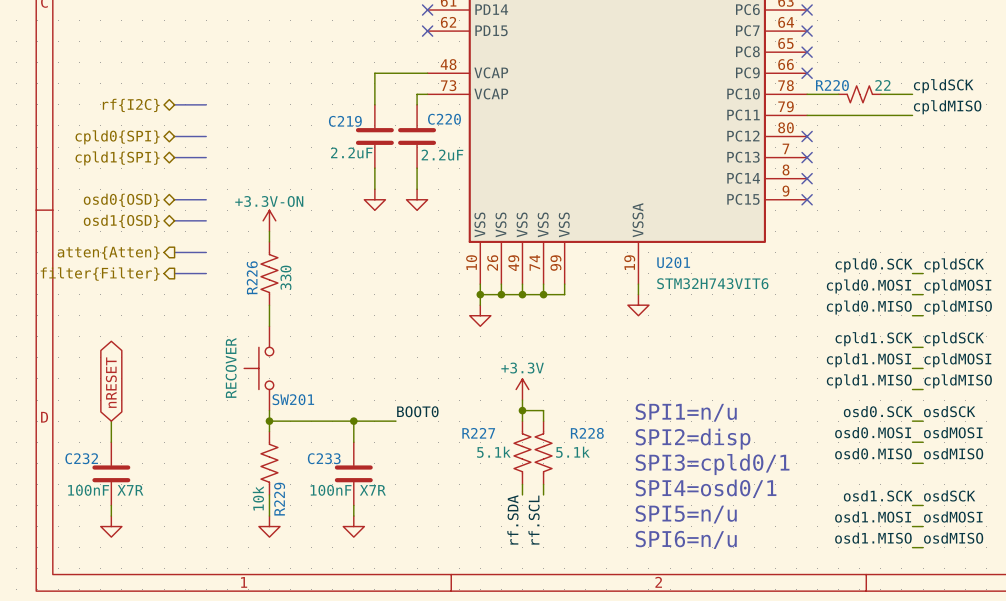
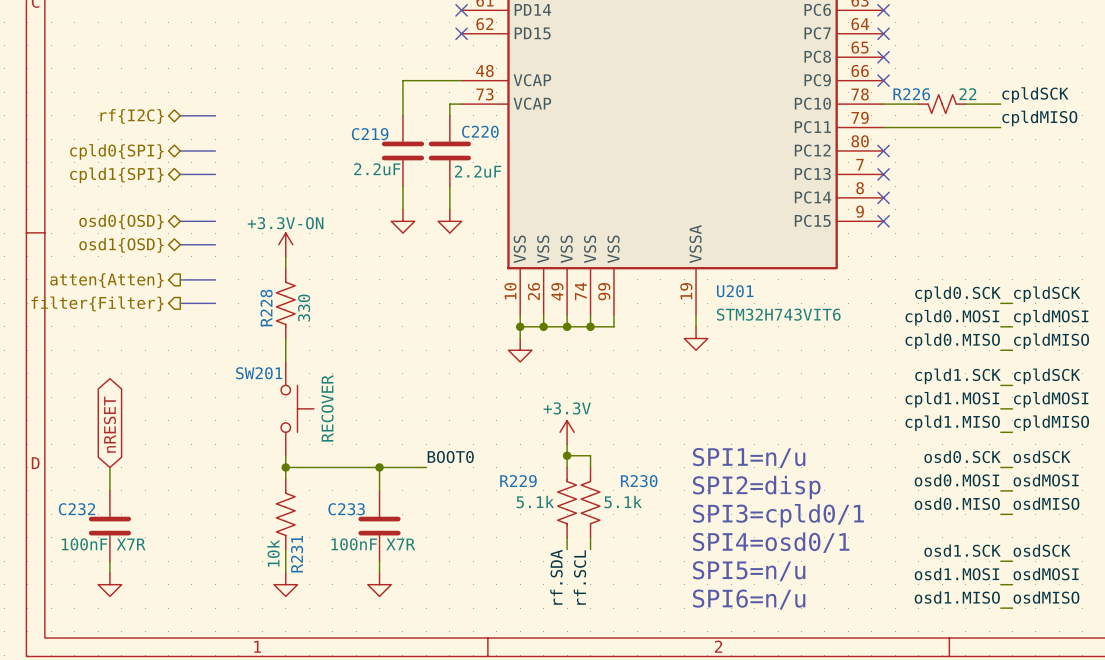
R220 name: R220 (832, 85) -> R226 (911, 94)
R226 name: R226 (252, 277) -> R228 (266, 308)
SW201 rotation: 0° (258, 368) -> 180° (297, 408)
R227 name: R227 (478, 433) -> R229 (518, 481)
R228 name: R228 (587, 433) -> R230 (639, 481)
R229 name: R229 (279, 499) -> R231 (297, 554)

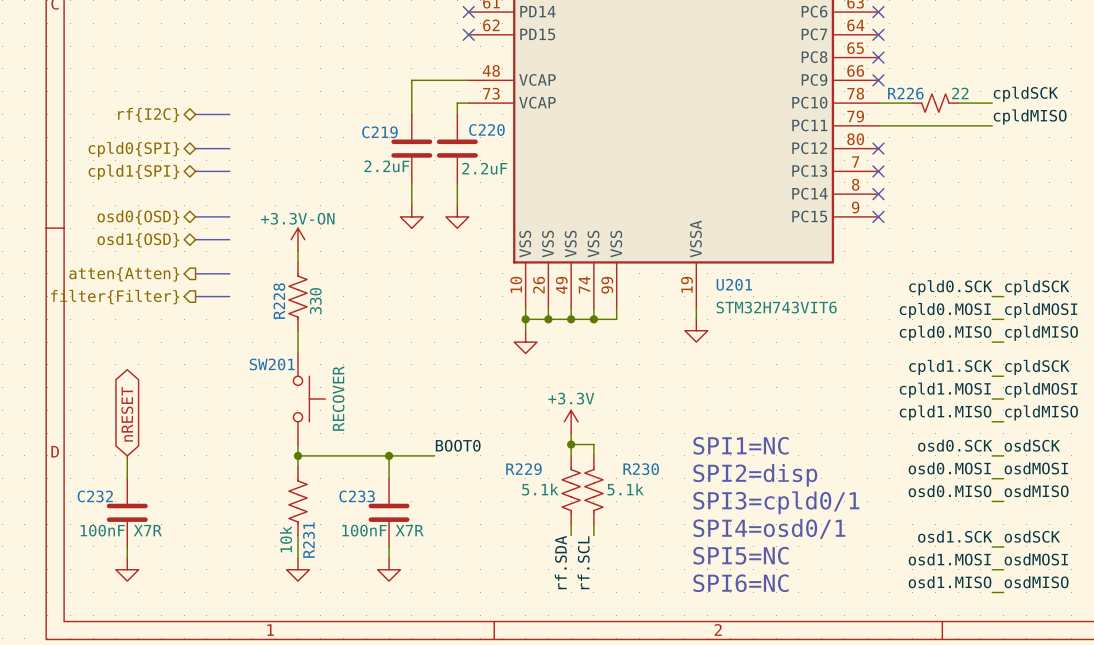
text: SPI1=n/u (749, 457) -> SPI1=NC (741, 445)
text: SPI5=n/u (749, 571) -> SPI5=NC (741, 555)
text: SPI6=n/u (749, 599) -> SPI6=NC (741, 583)

